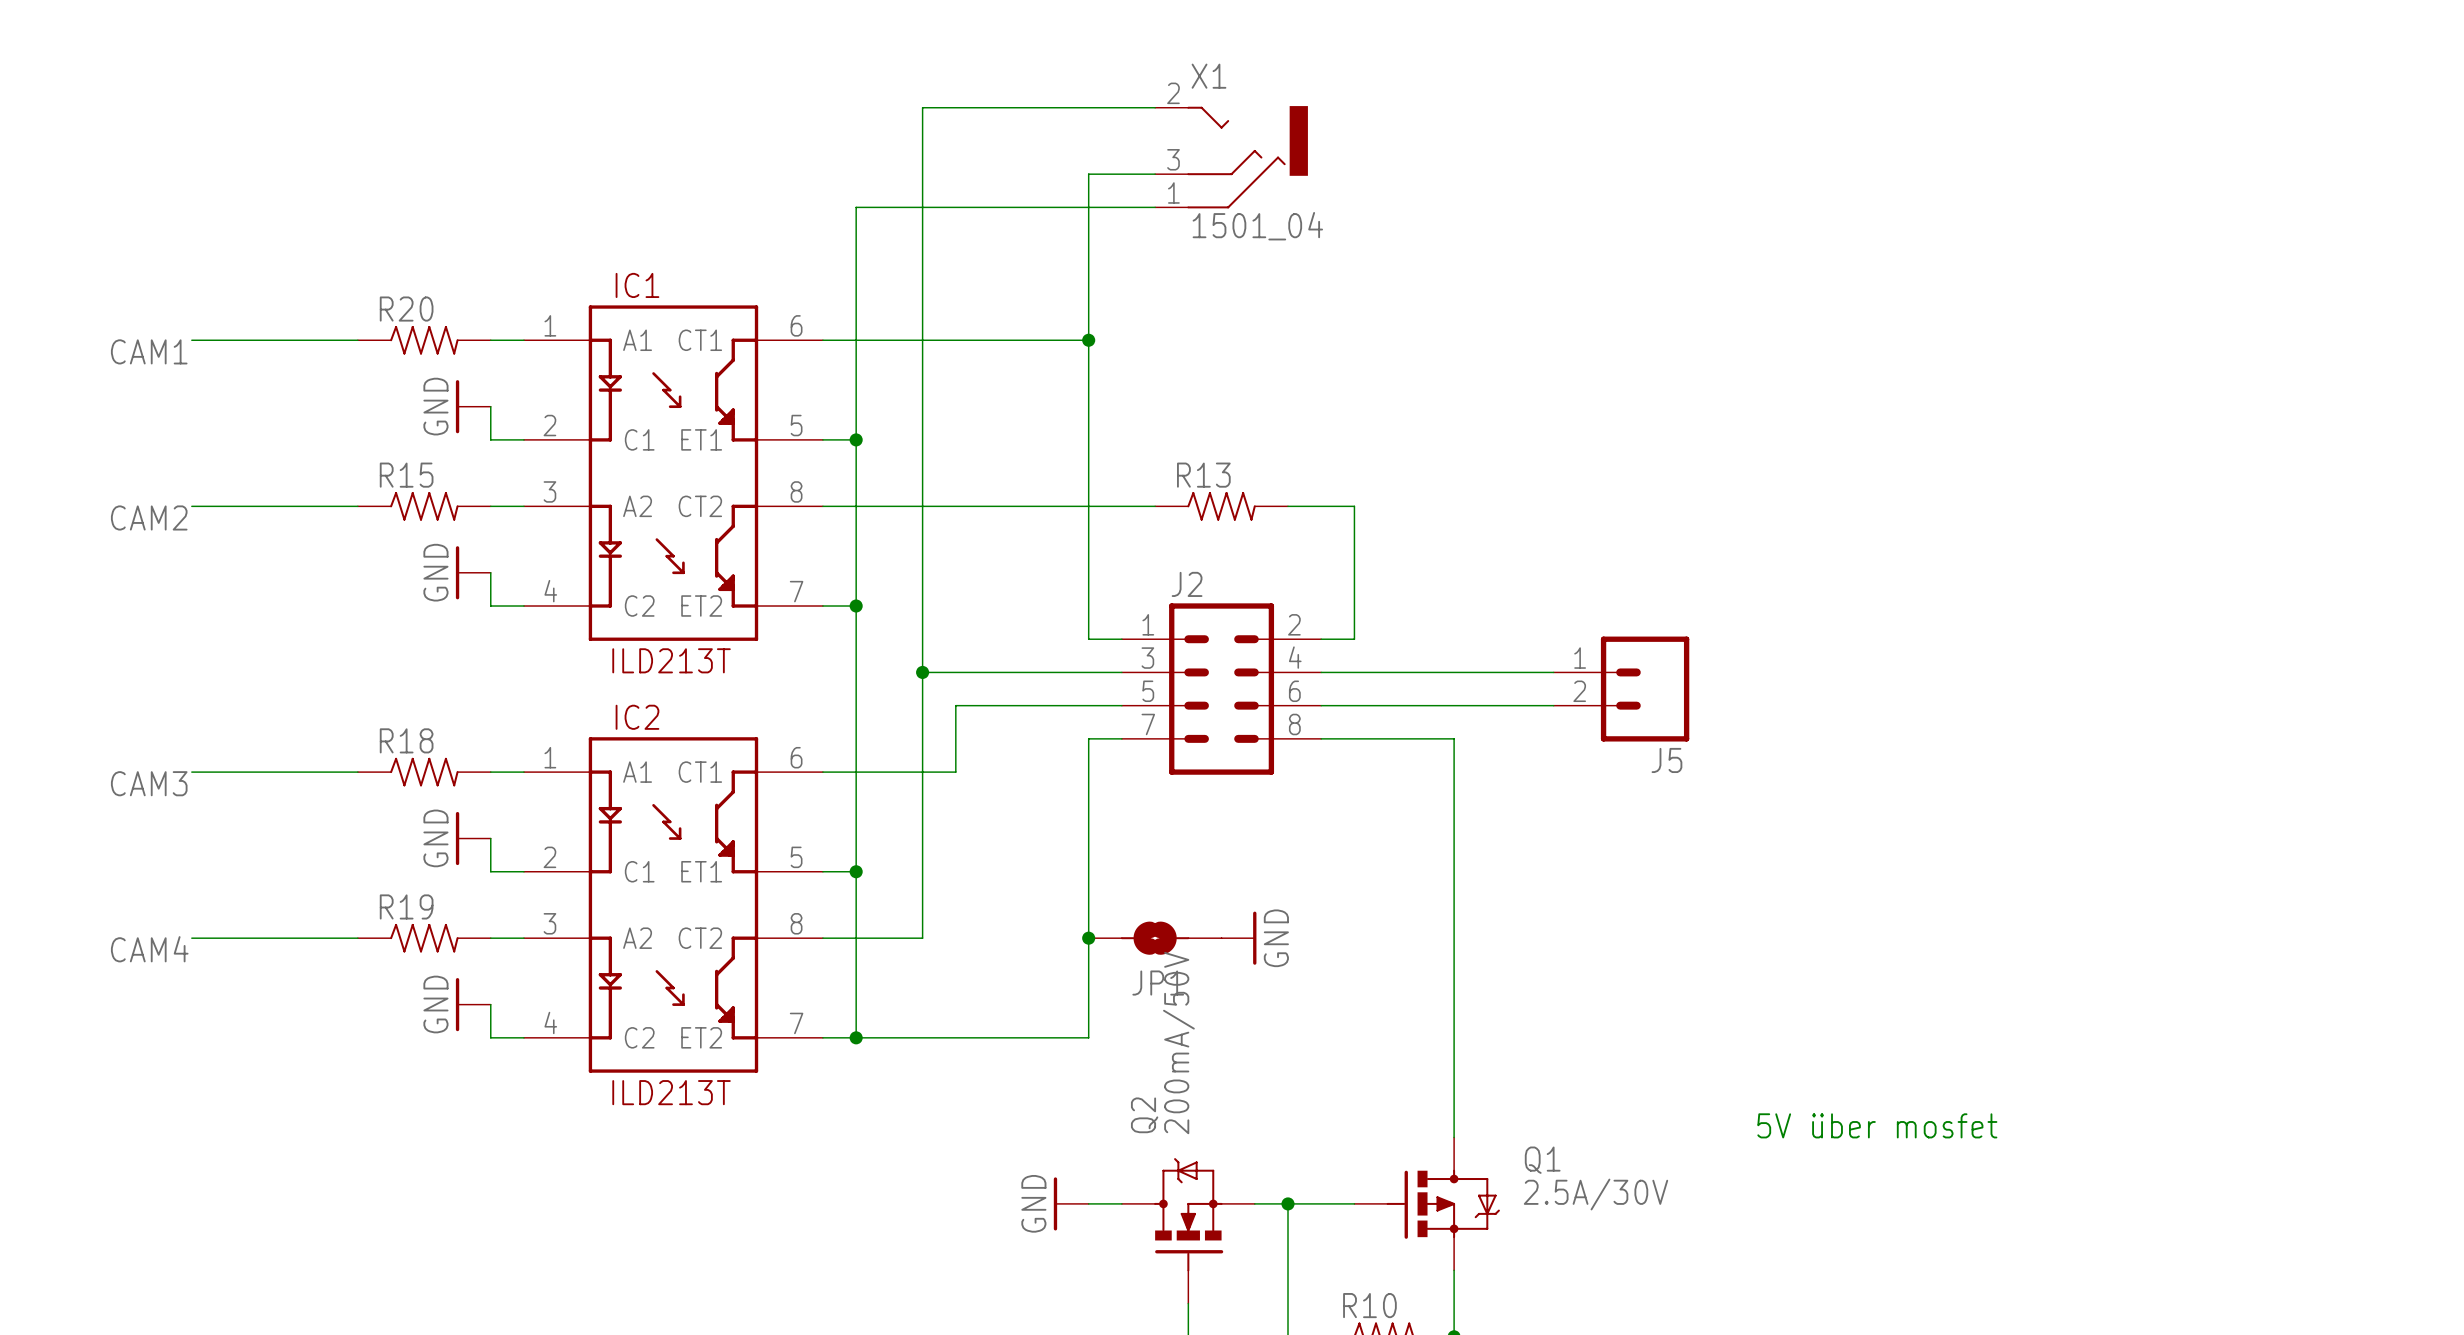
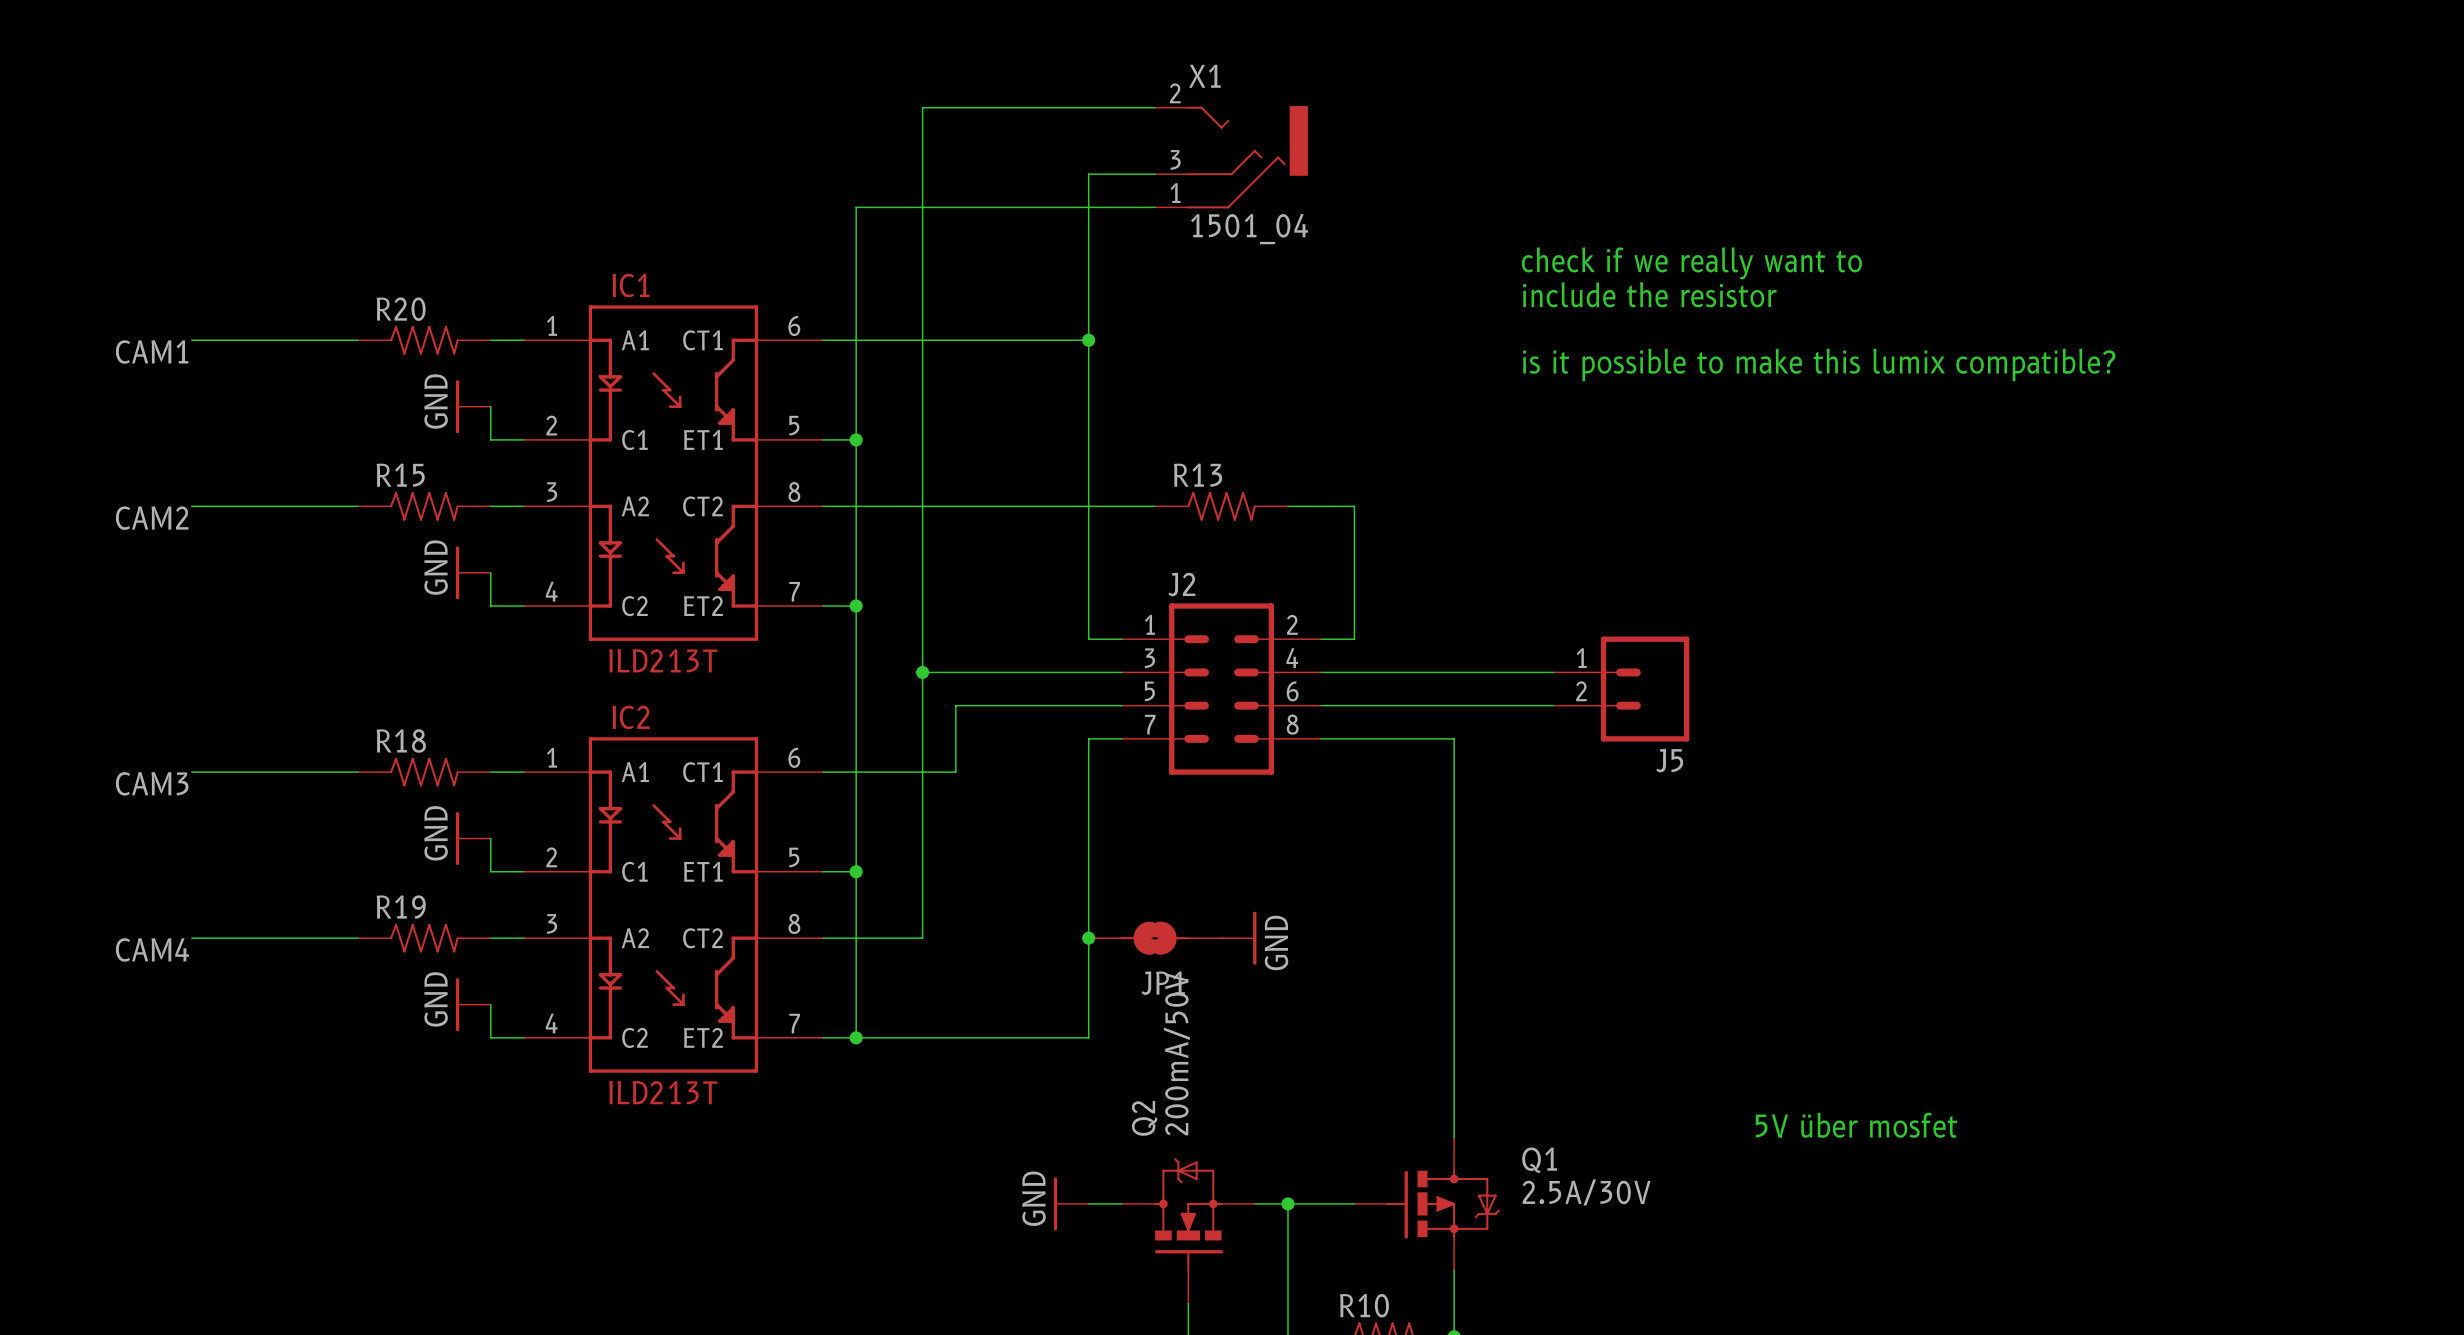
text: none -> check if we really want to (1691, 263)
text: none -> include the resistor (1649, 294)
text: none -> is it possible to make this lumix compatible? (1819, 364)

